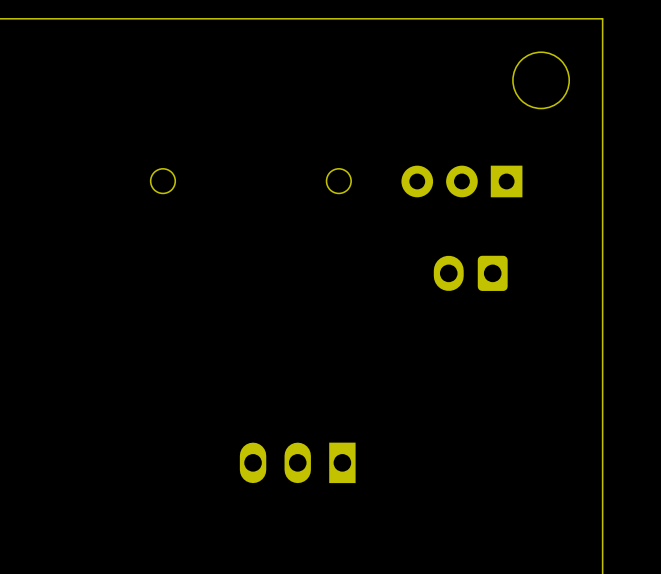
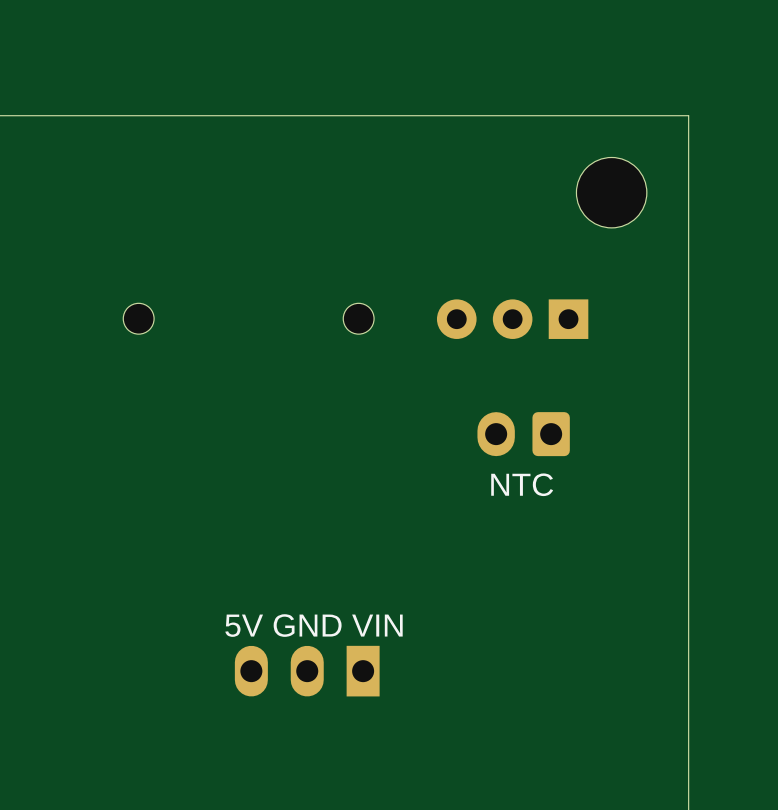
text: none -> NTC (522, 484)
text: none -> 5V GND VIN (314, 625)

